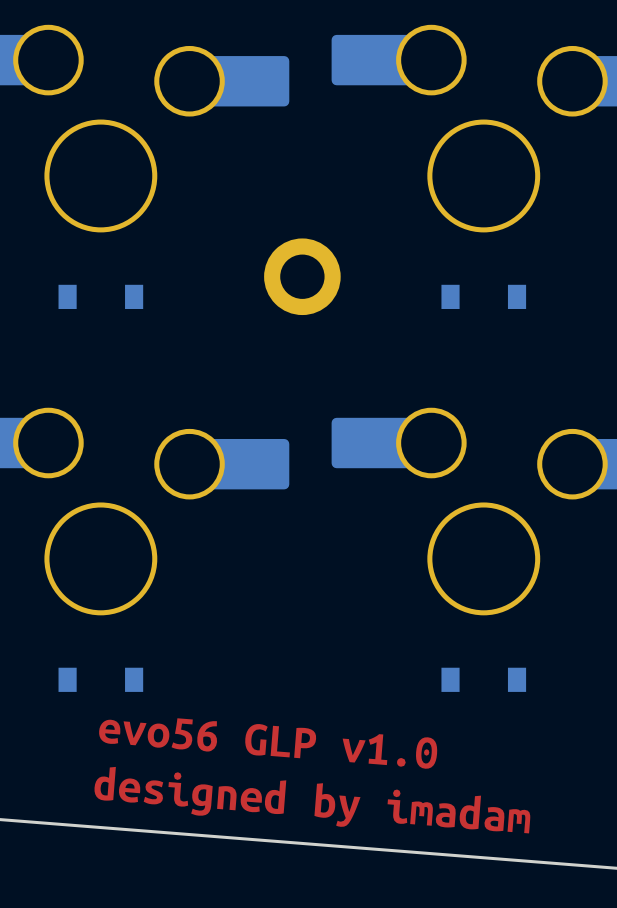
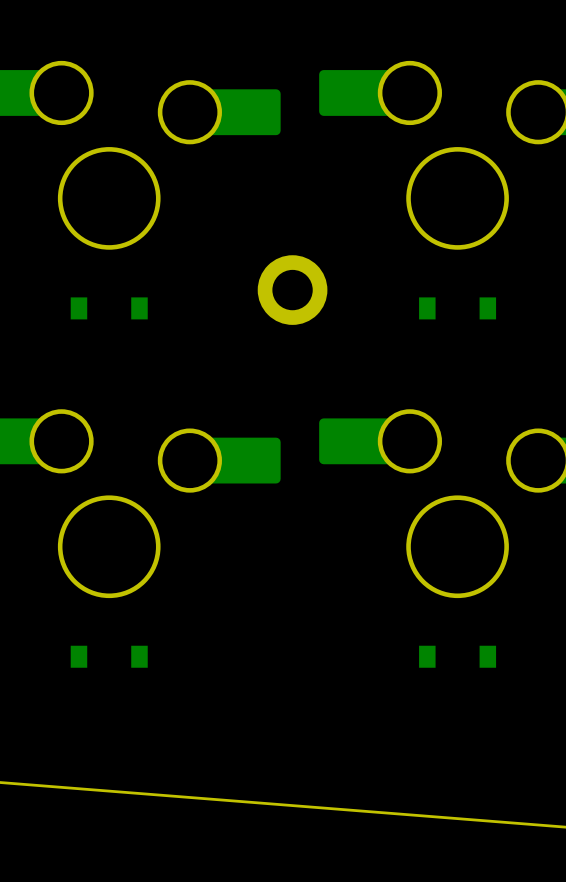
drawing: [94, 718, 531, 834] -> none

